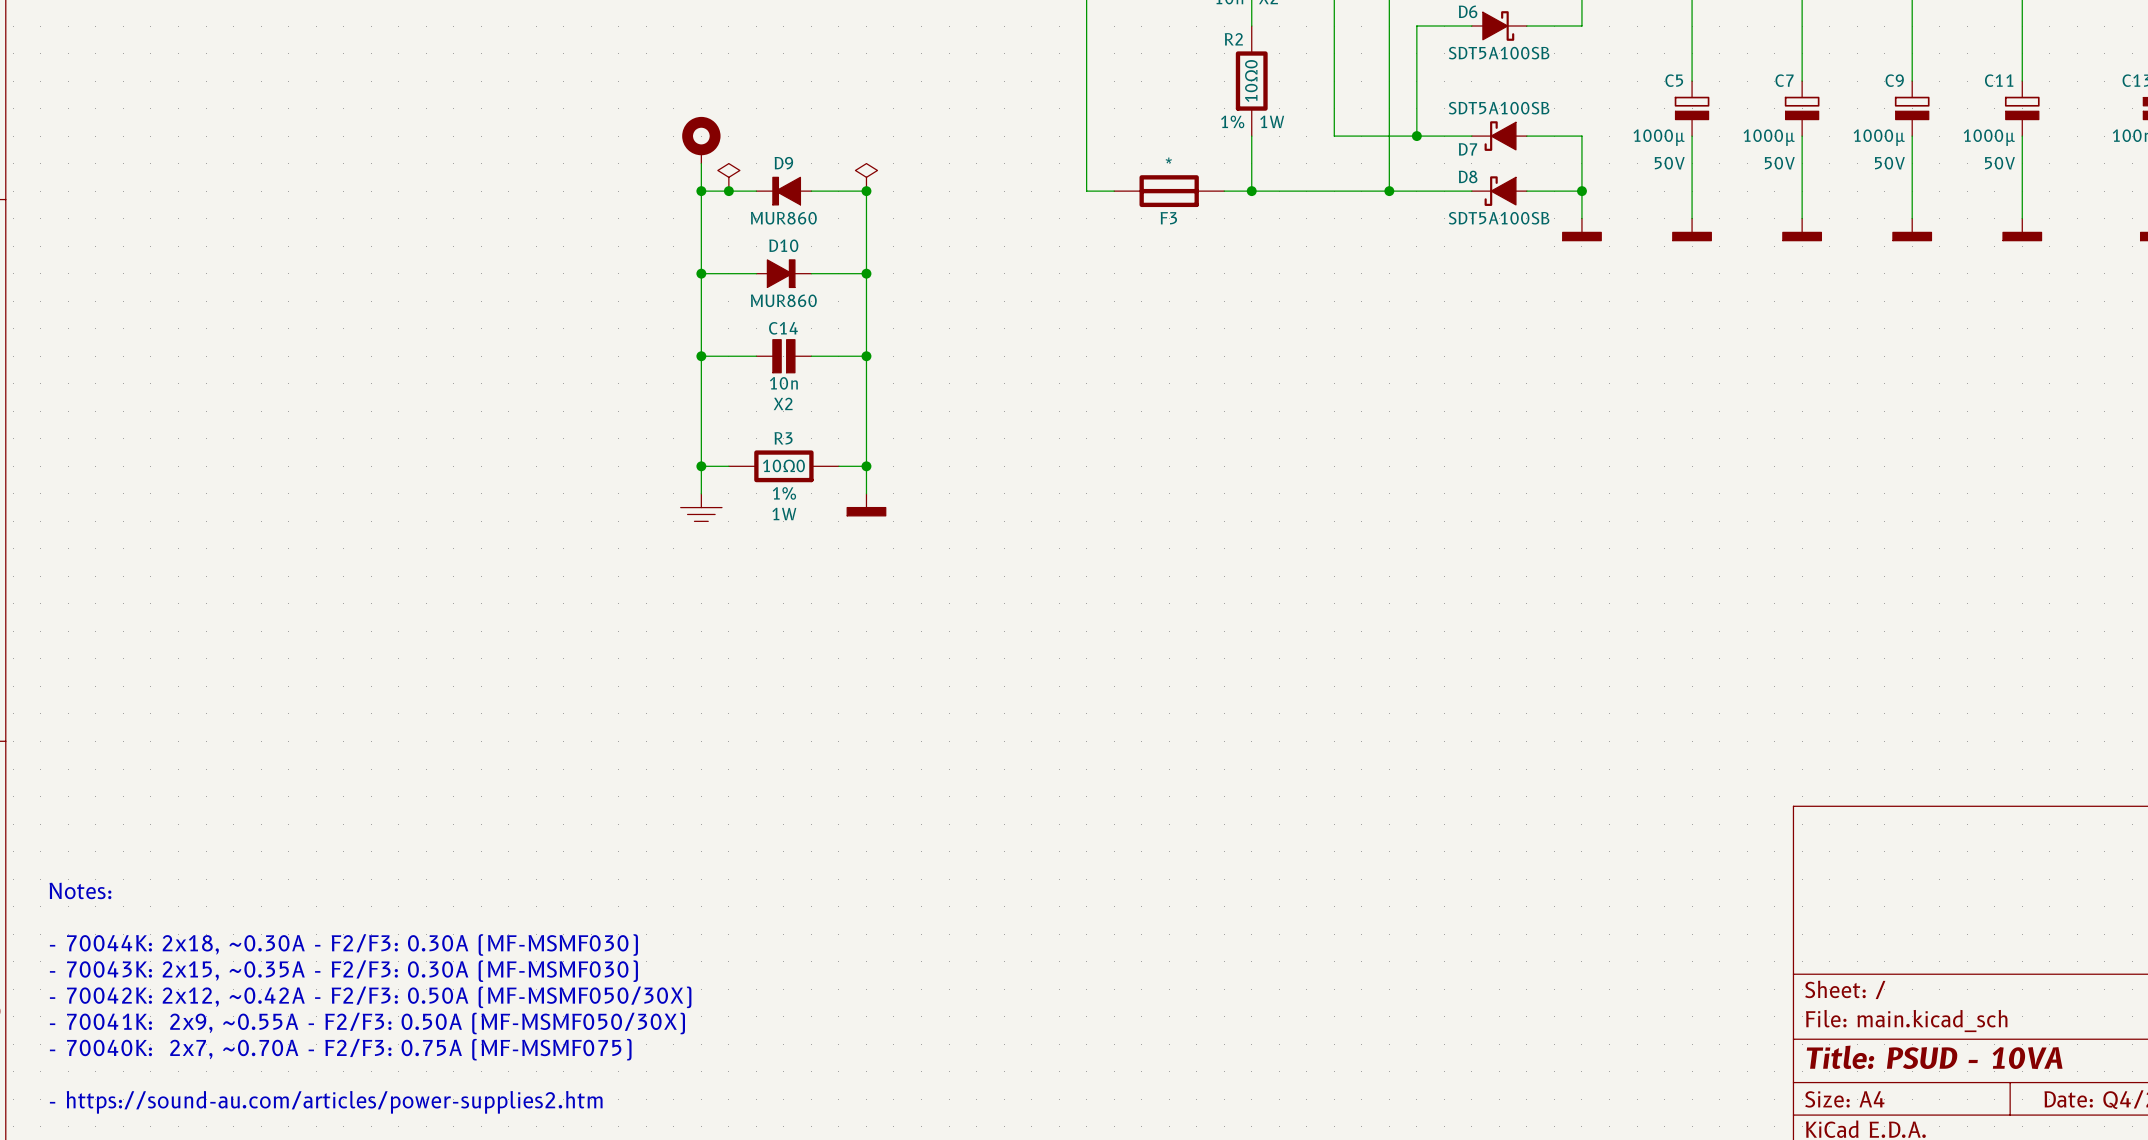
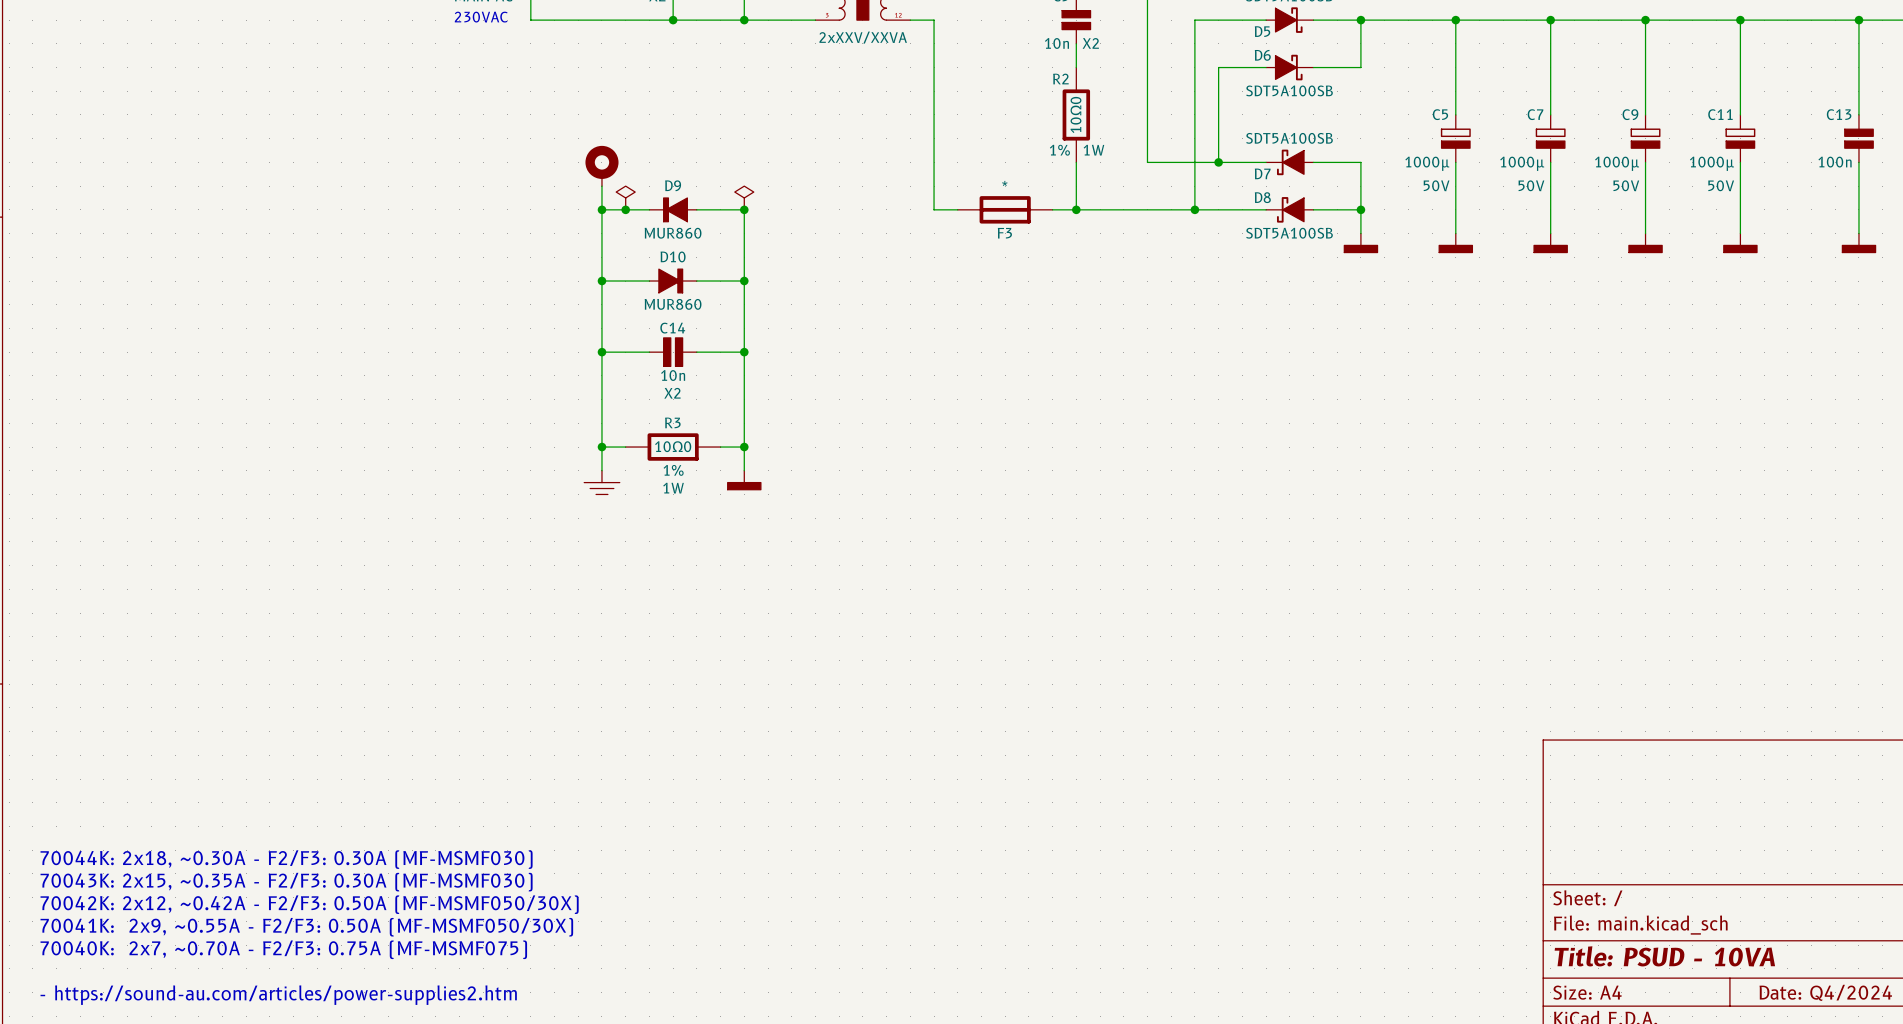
text: Notes: (80, 890) -> none
text: - 70044K: 2x18, ~0.30A - F2/F3: 0.30A (MF-MSMF030) (343, 945) -> 70044K: 2x18, ~0.30A - F2/F3: 0.30A (MF-MSMF030) (286, 859)
text: - 70043K: 2x15, ~0.35A - F2/F3: 0.30A (MF-MSMF030) (343, 971) -> 70043K: 2x15, ~0.35A - F2/F3: 0.30A (MF-MSMF030) (286, 882)
text: - 70042K: 2x12, ~0.42A - F2/F3: 0.50A (MF-MSMF050/30X) (370, 997) -> 70042K: 2x12, ~0.42A - F2/F3: 0.50A (MF-MSMF050/30X) (309, 904)
text: - 70041K: 2x9, ~0.55A - F2/F3: 0.50A (MF-MSMF050/30X) (367, 1023) -> 70041K: 2x9, ~0.55A - F2/F3: 0.50A (MF-MSMF050/30X) (306, 927)
text: - 70040K: 2x7, ~0.70A - F2/F3: 0.75A (MF-MSMF075) (340, 1049) -> 70040K: 2x7, ~0.70A - F2/F3: 0.75A (MF-MSMF075) (283, 949)

